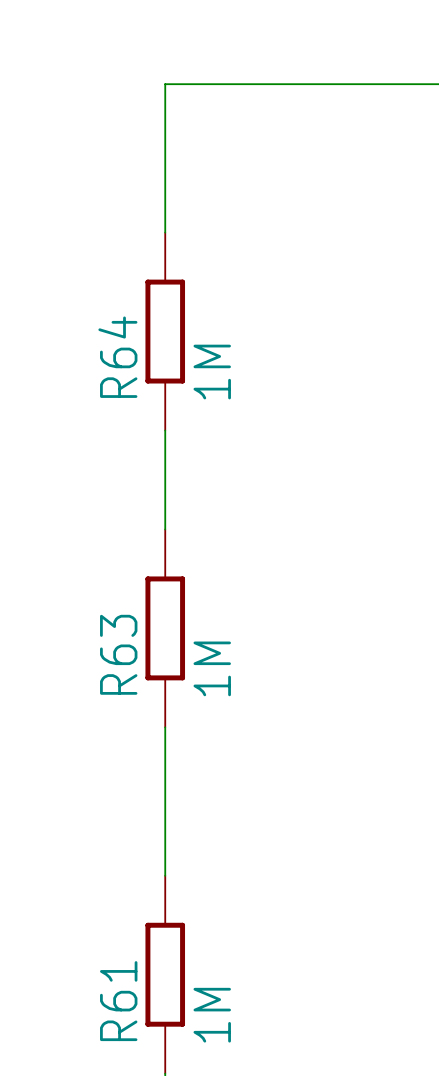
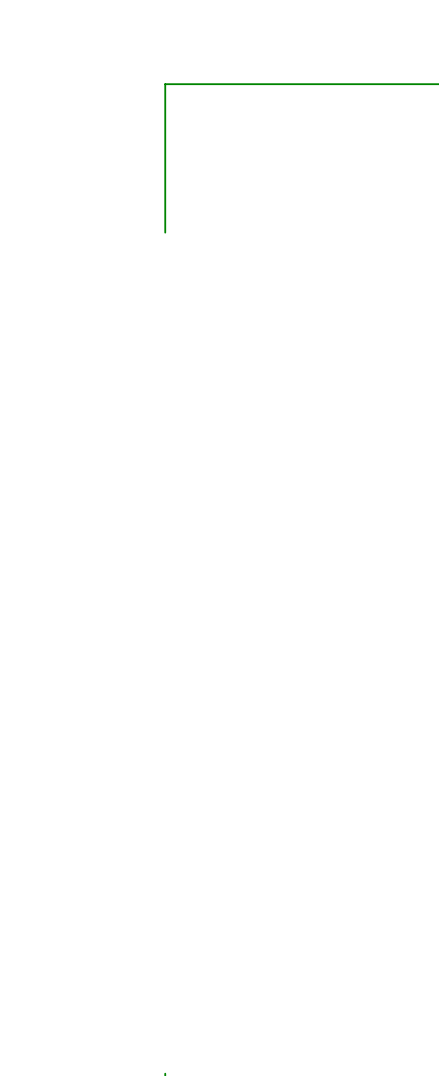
R64: 1M (165, 331) -> none
wire: (165, 430) (165, 529) -> none
R63: 1M (165, 628) -> none
wire: (165, 727) (165, 875) -> none
R61: 1M (165, 974) -> none

